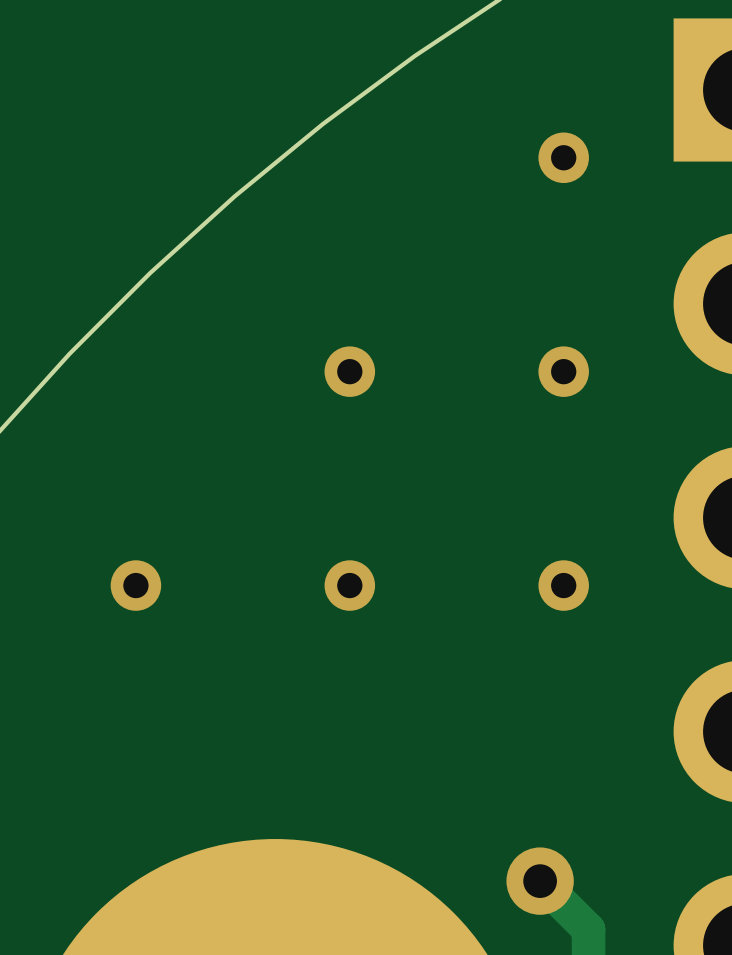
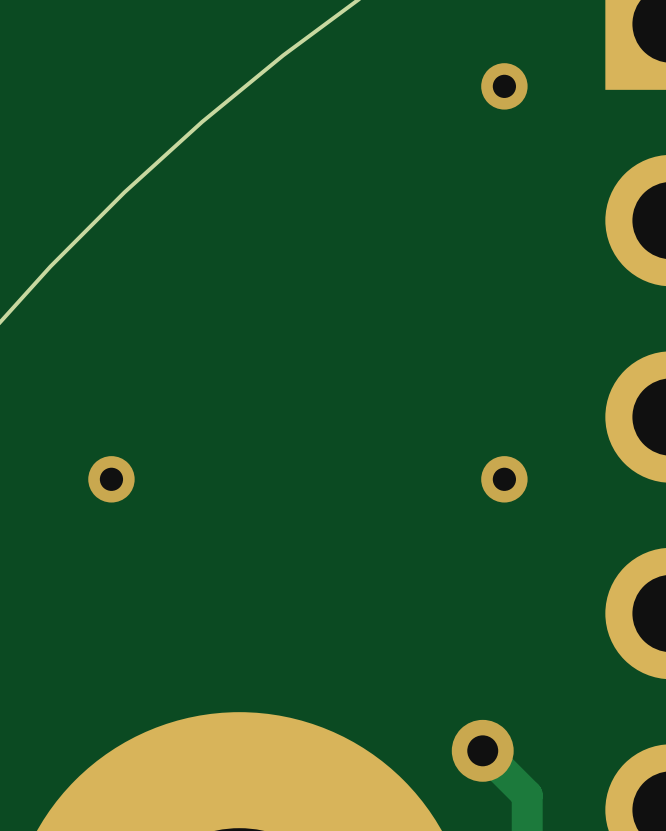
via: (349, 371) -> none
via: (563, 371) -> none
via: (349, 585) -> none

